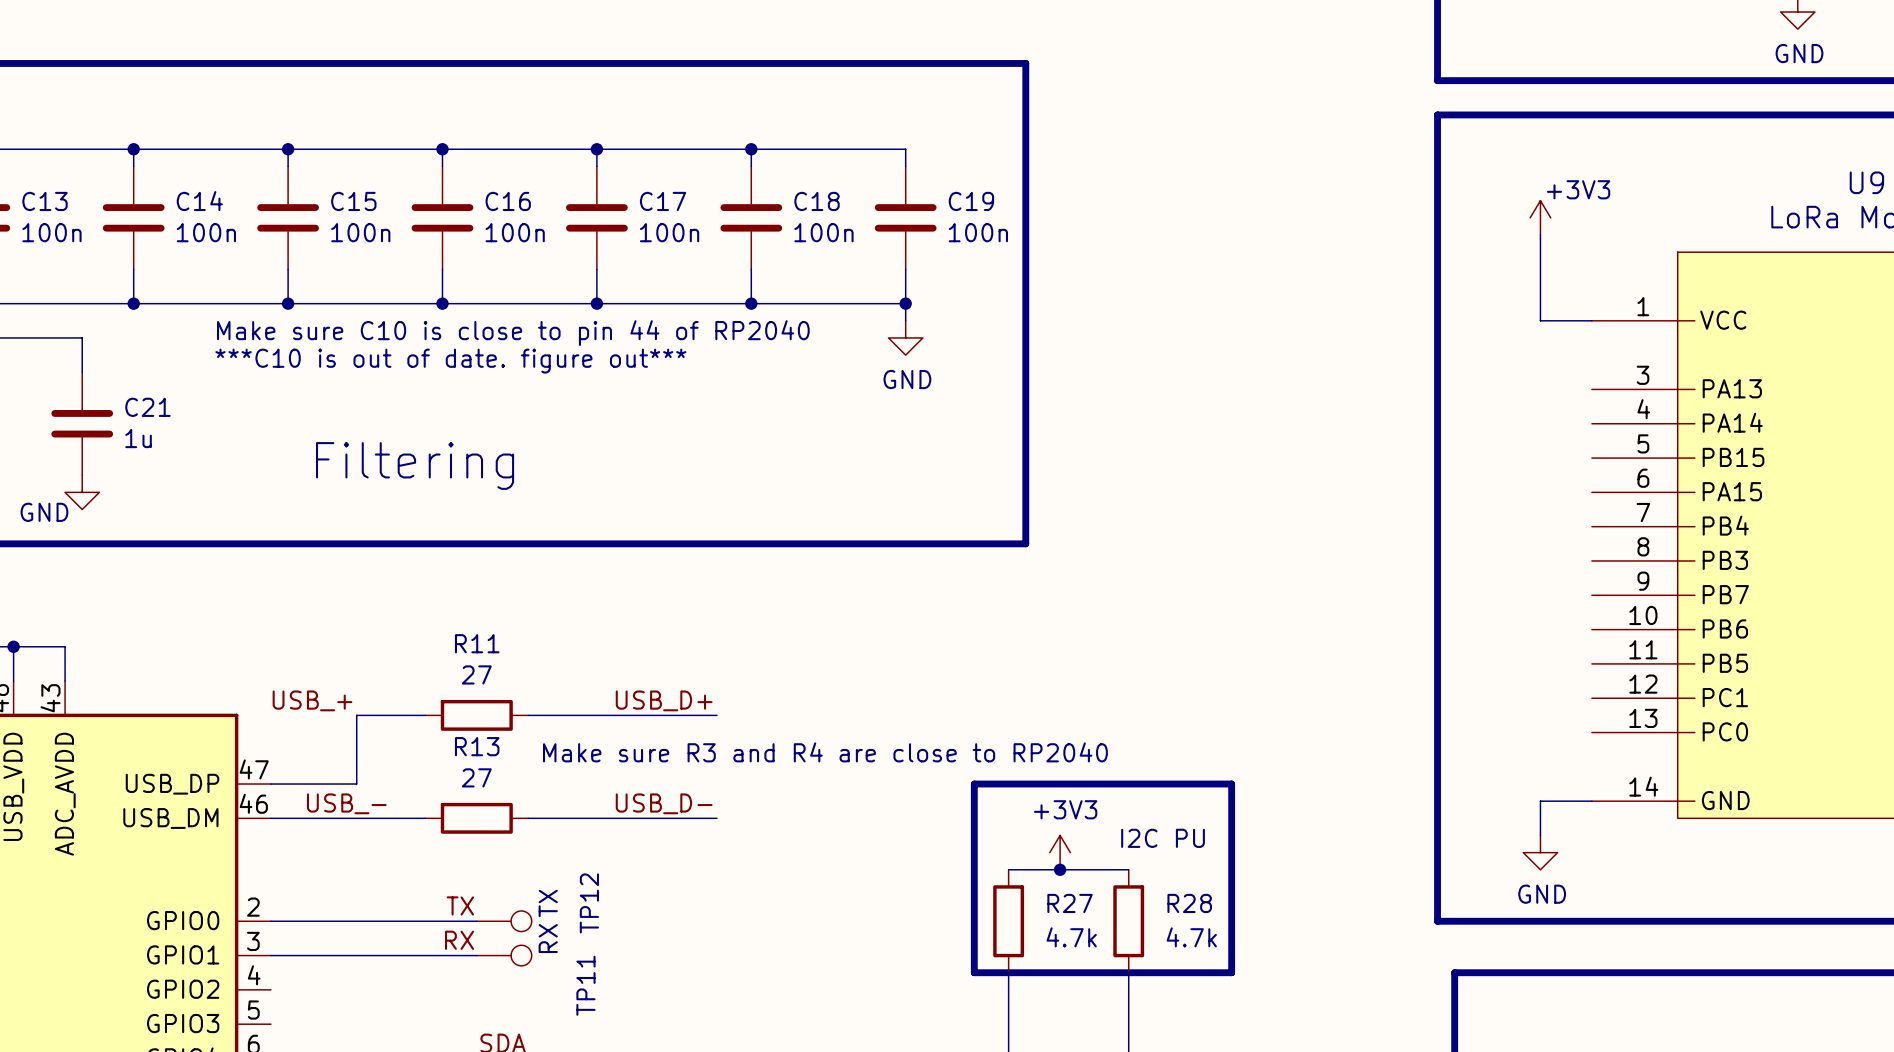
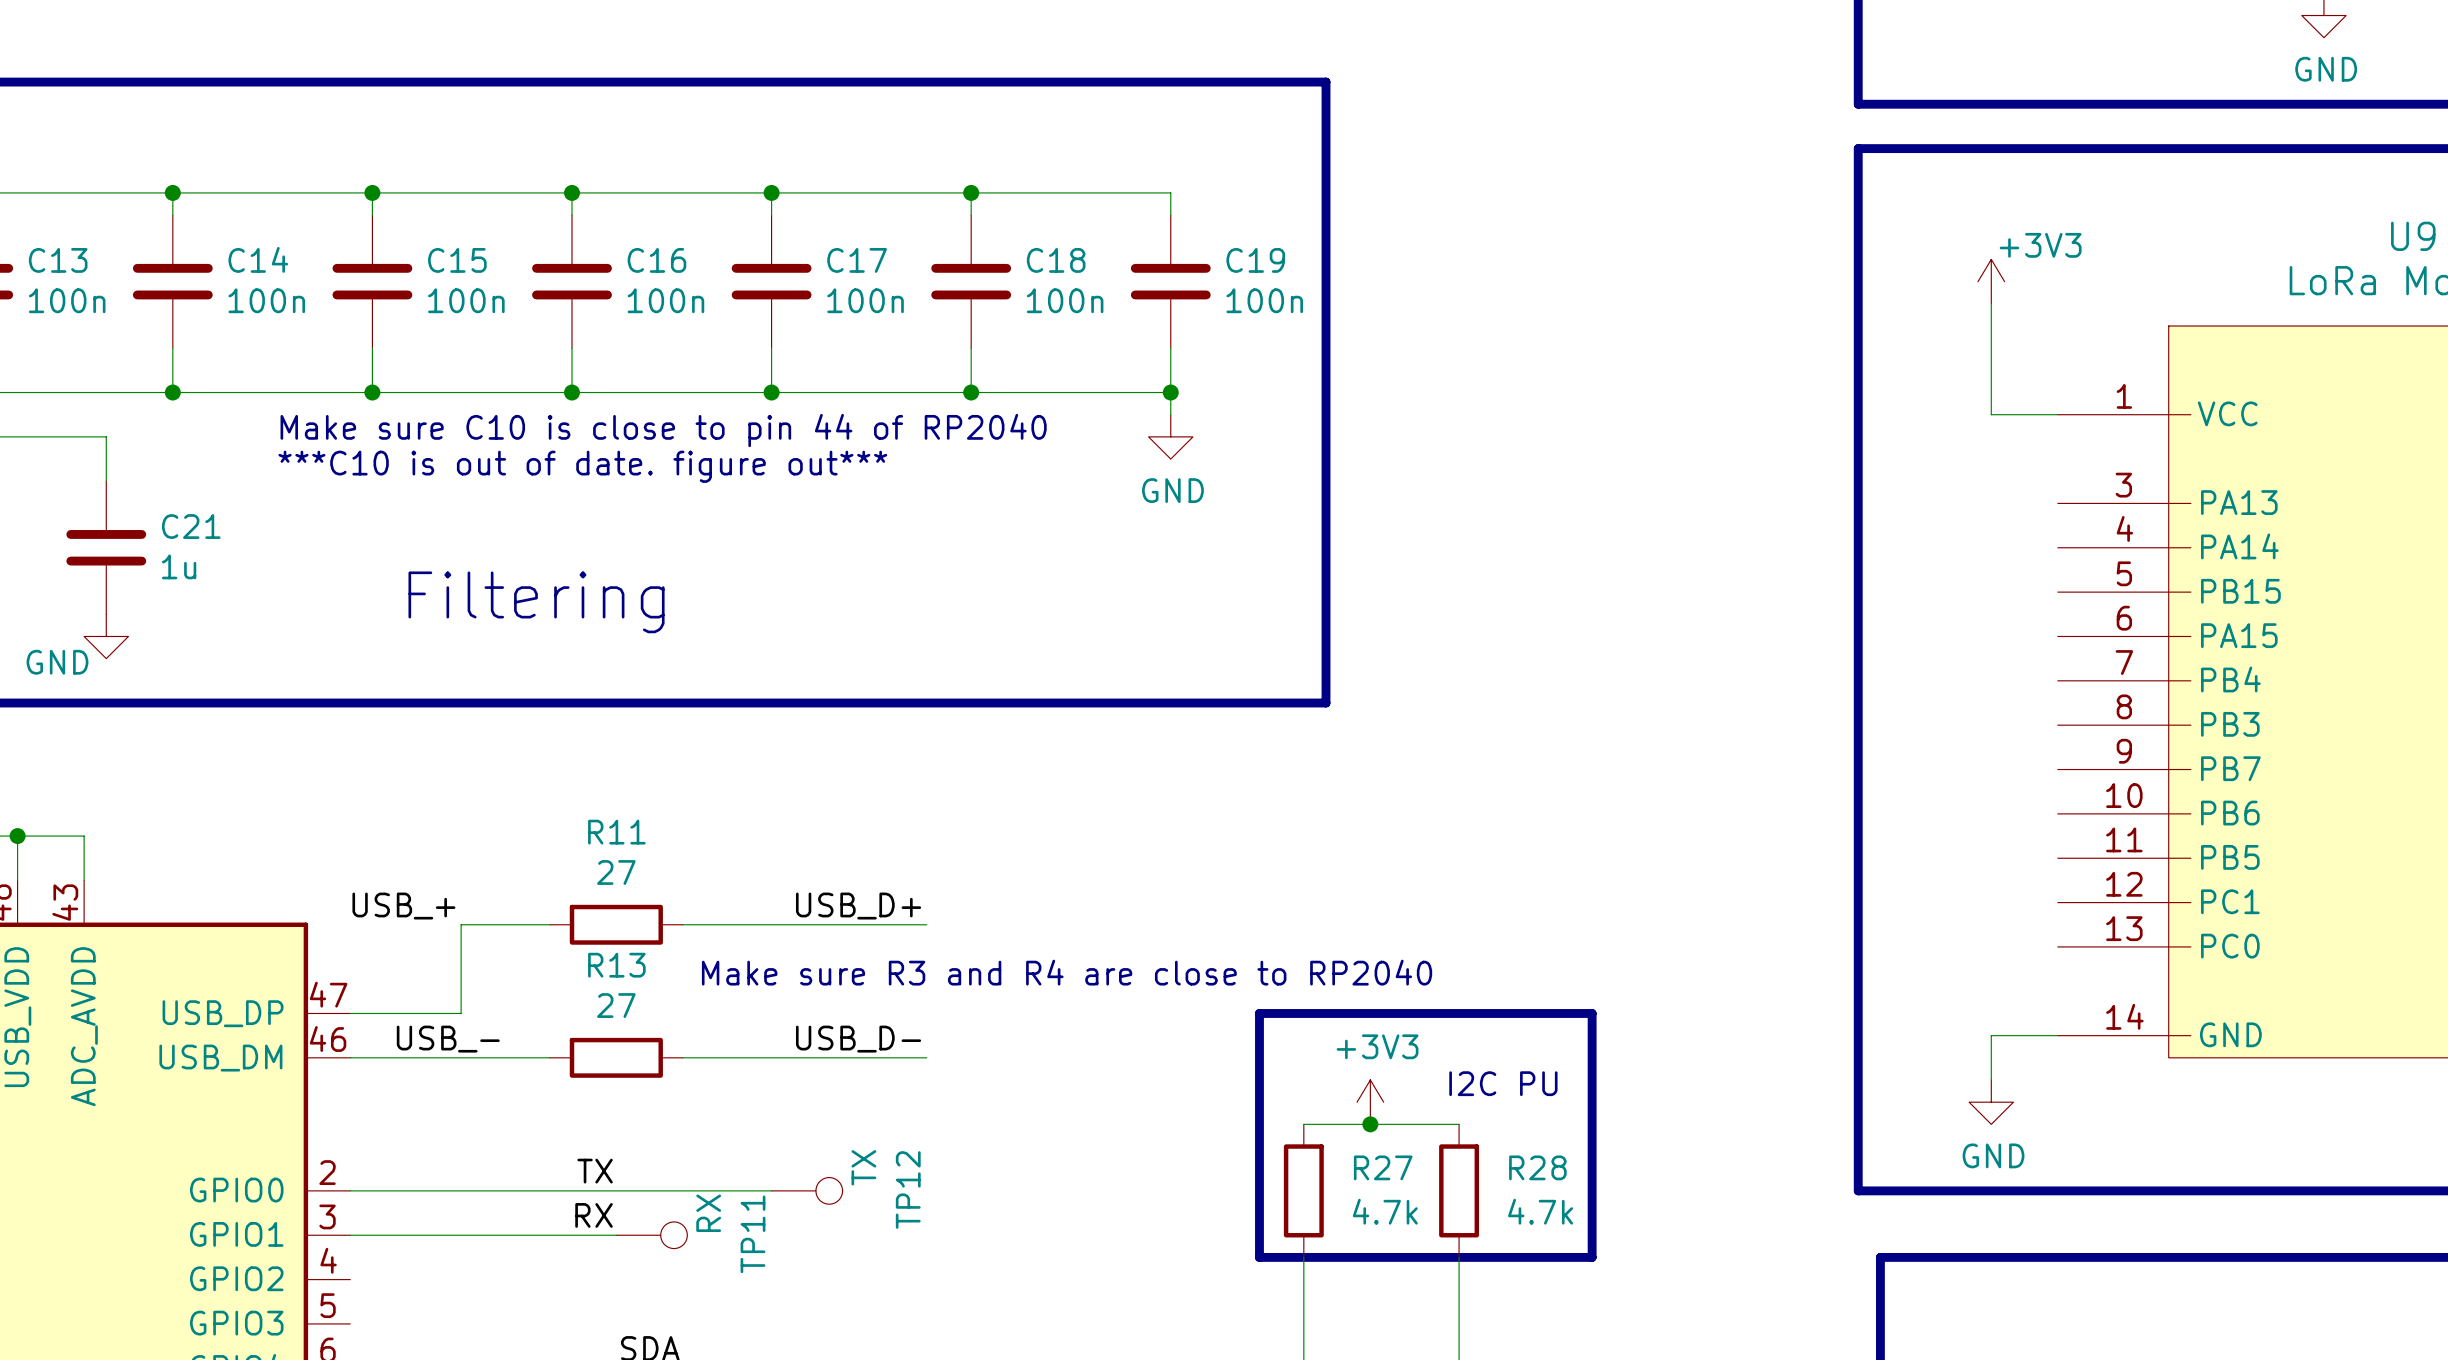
TP12 name position: TP12 (589, 903) -> TP12 (908, 1190)
wire: none -> (616, 1190) (771, 1190)
TP12 position: (504, 921) -> (807, 1190)
TP11 name position: TP11 (585, 985) -> TP11 (753, 1234)

